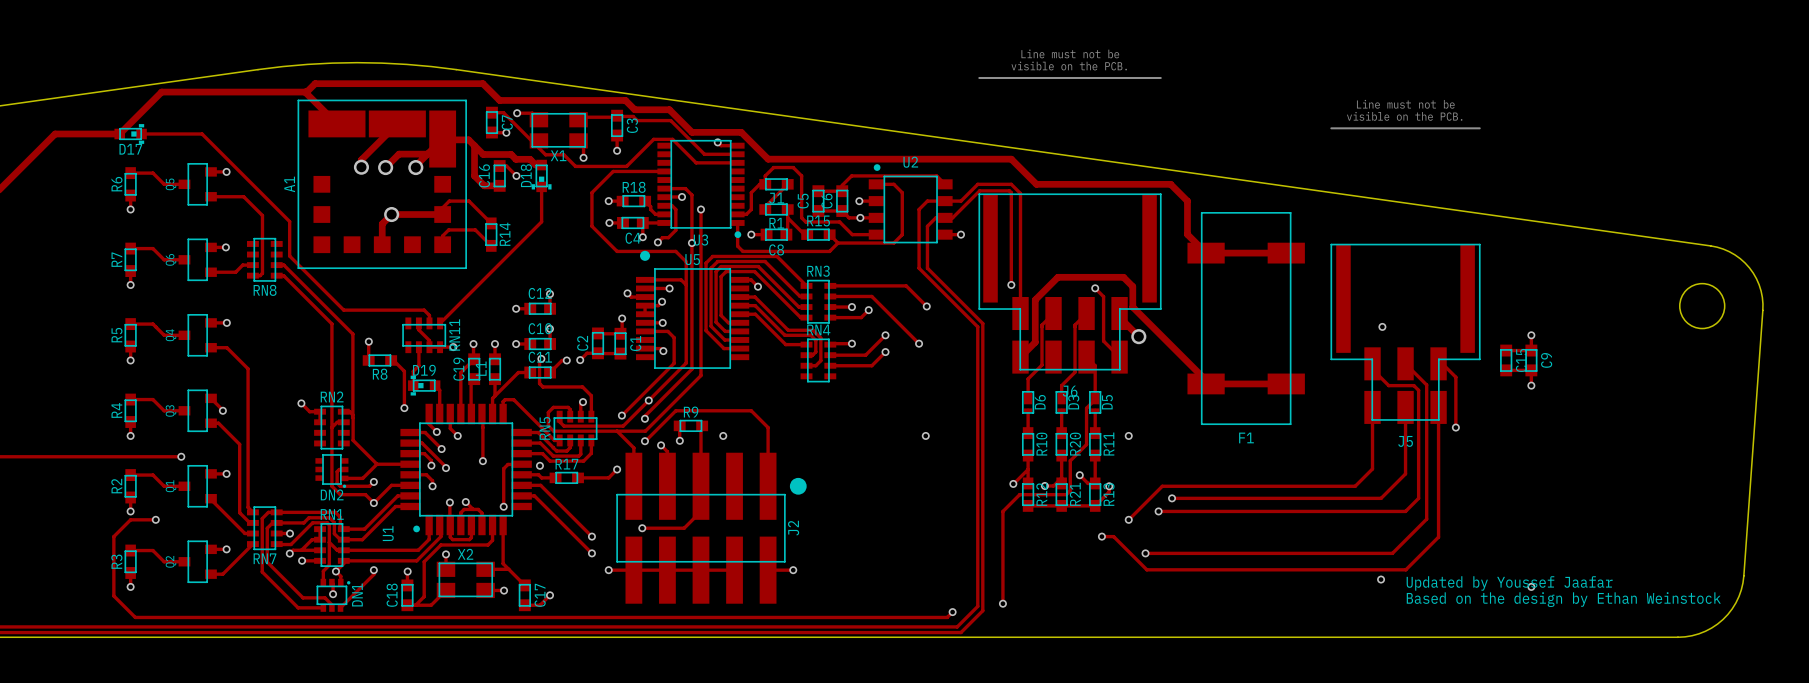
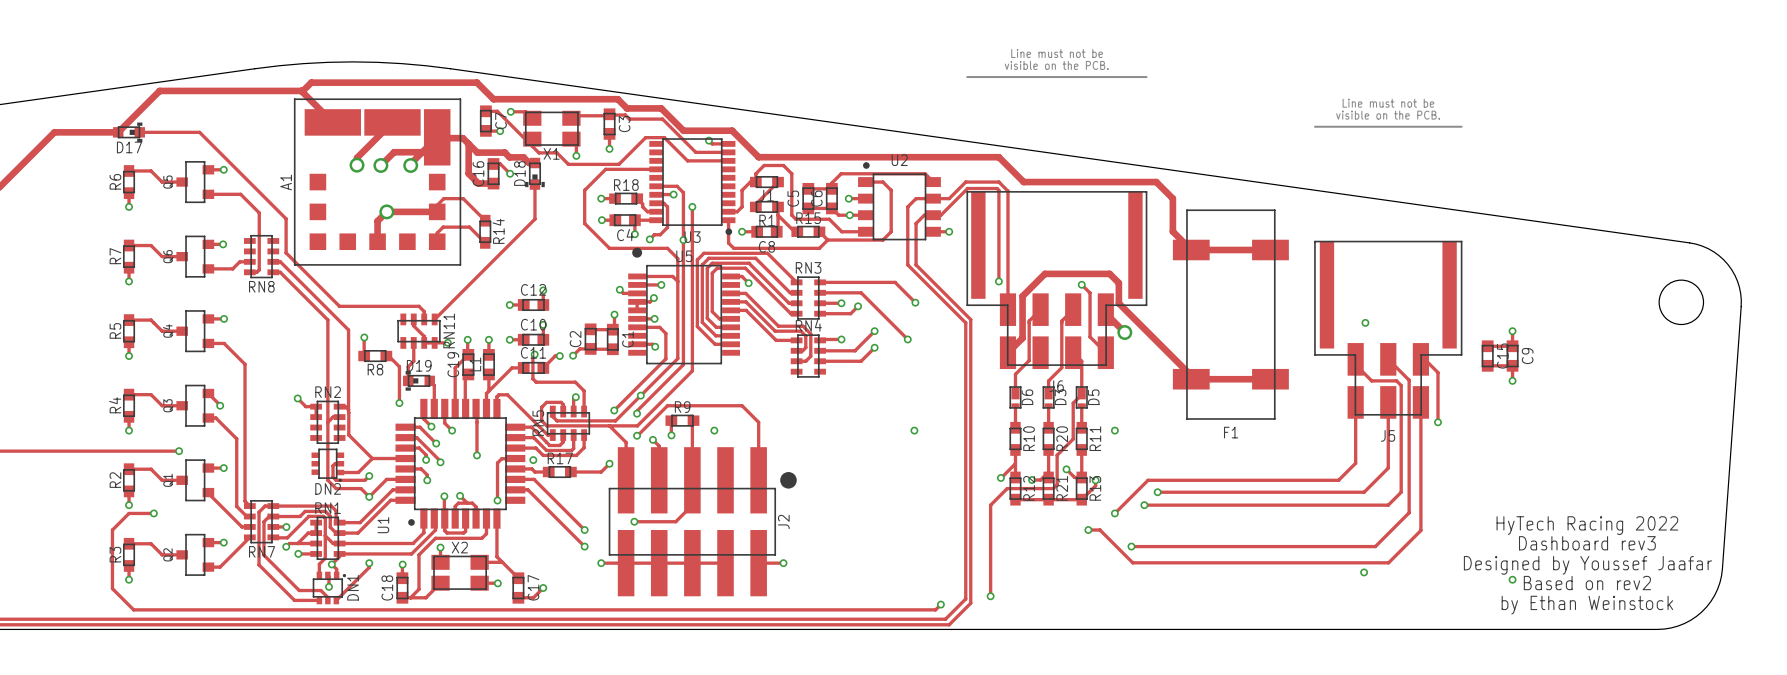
text: none -> HyTech Racing 2022 (1587, 525)
text: none -> Dashboard rev3 (1587, 543)
text: Updated by Youssef Jaafar (1509, 583) -> Designed by Youssef Jaafar (1587, 565)
text: none -> Based on rev2 (1587, 583)
text: Based on the design by Ethan Weinstock (1563, 599) -> by Ethan Weinstock (1587, 605)

